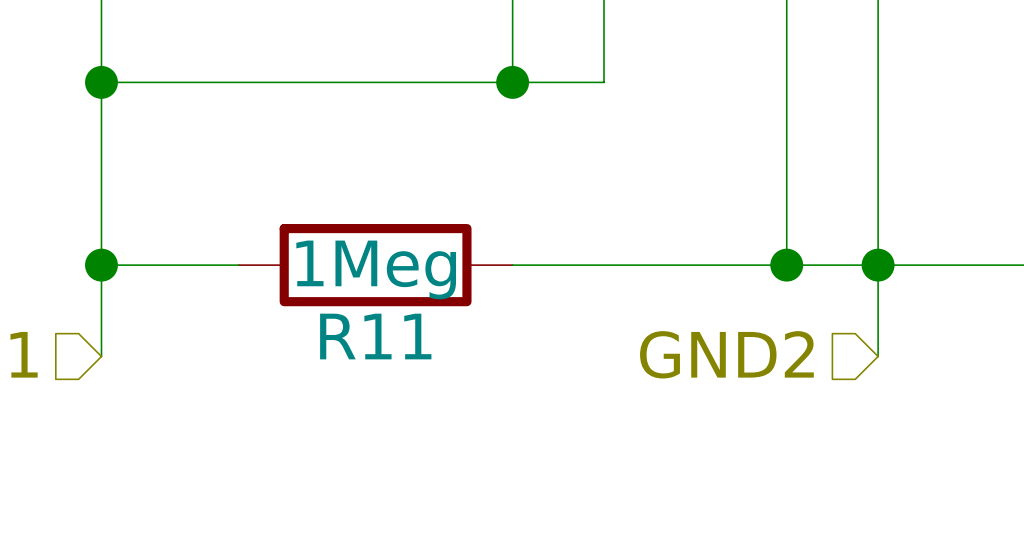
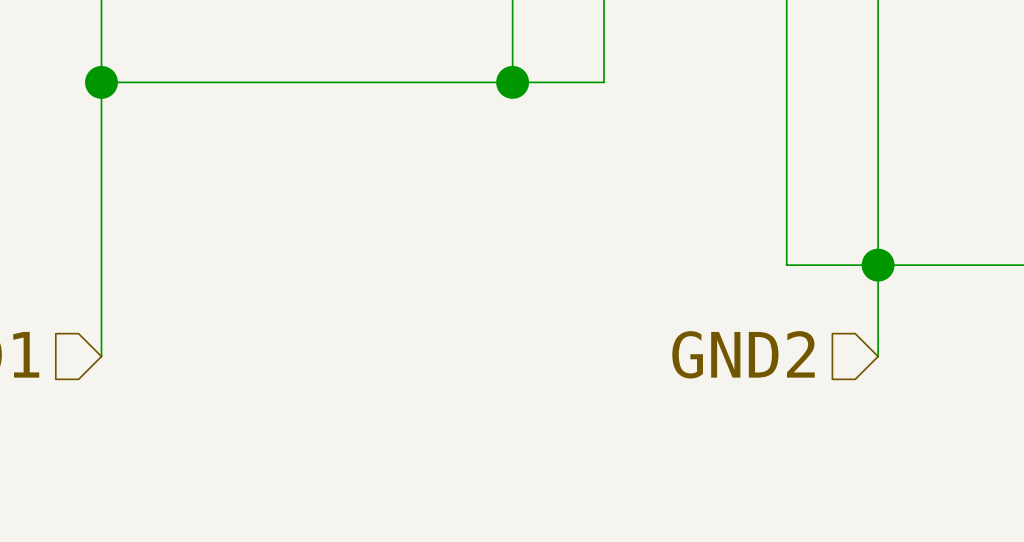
wire: (101, 265) (238, 265) -> none
junction: (101, 265) -> none
R11: 1Meg (375, 265) -> none
wire: (512, 265) (786, 265) -> none
junction: (786, 265) -> none

